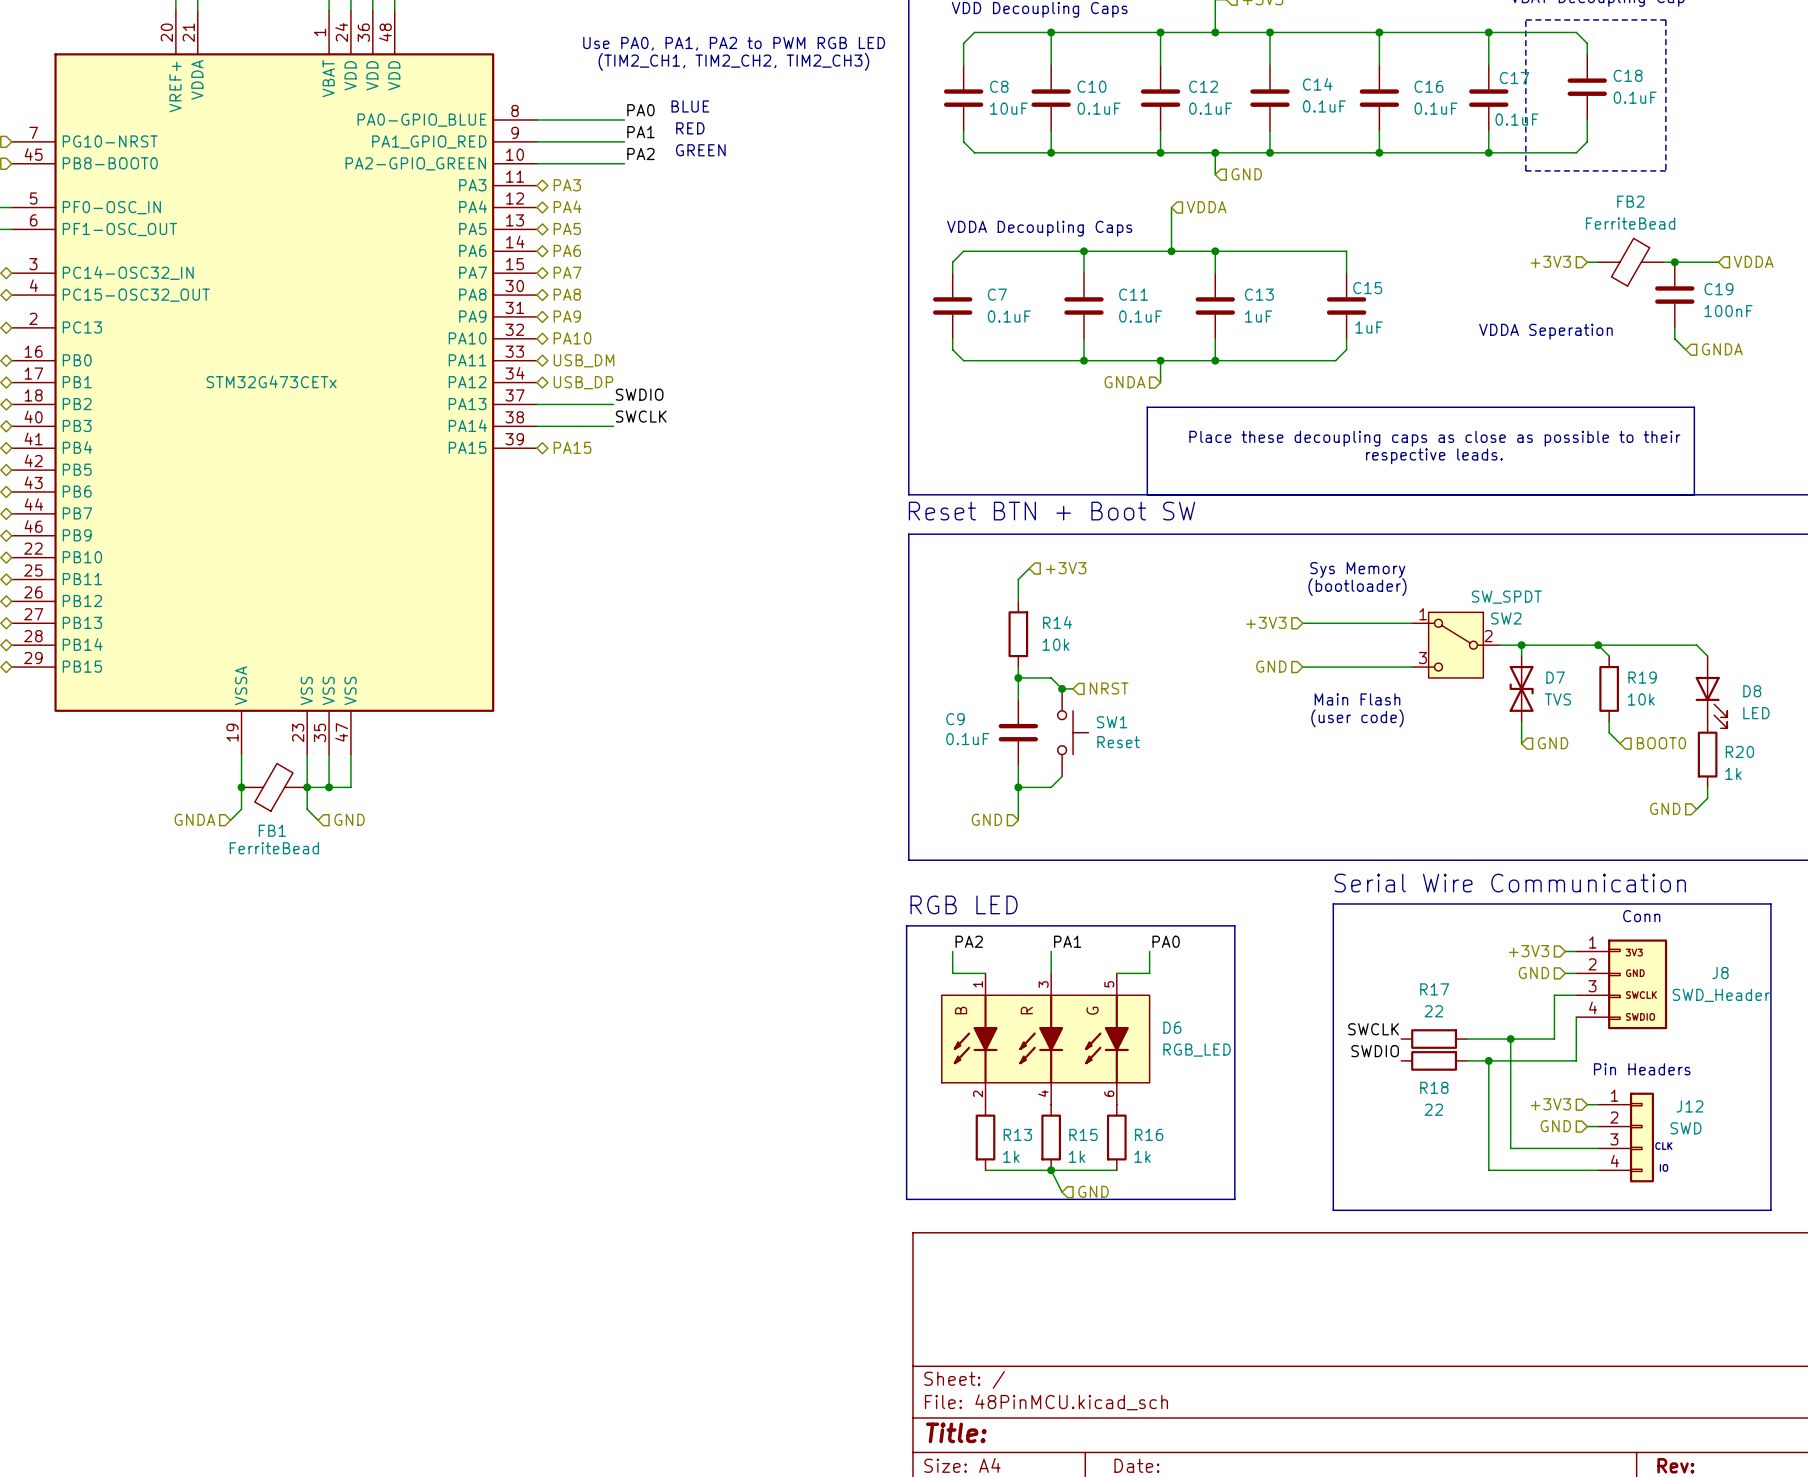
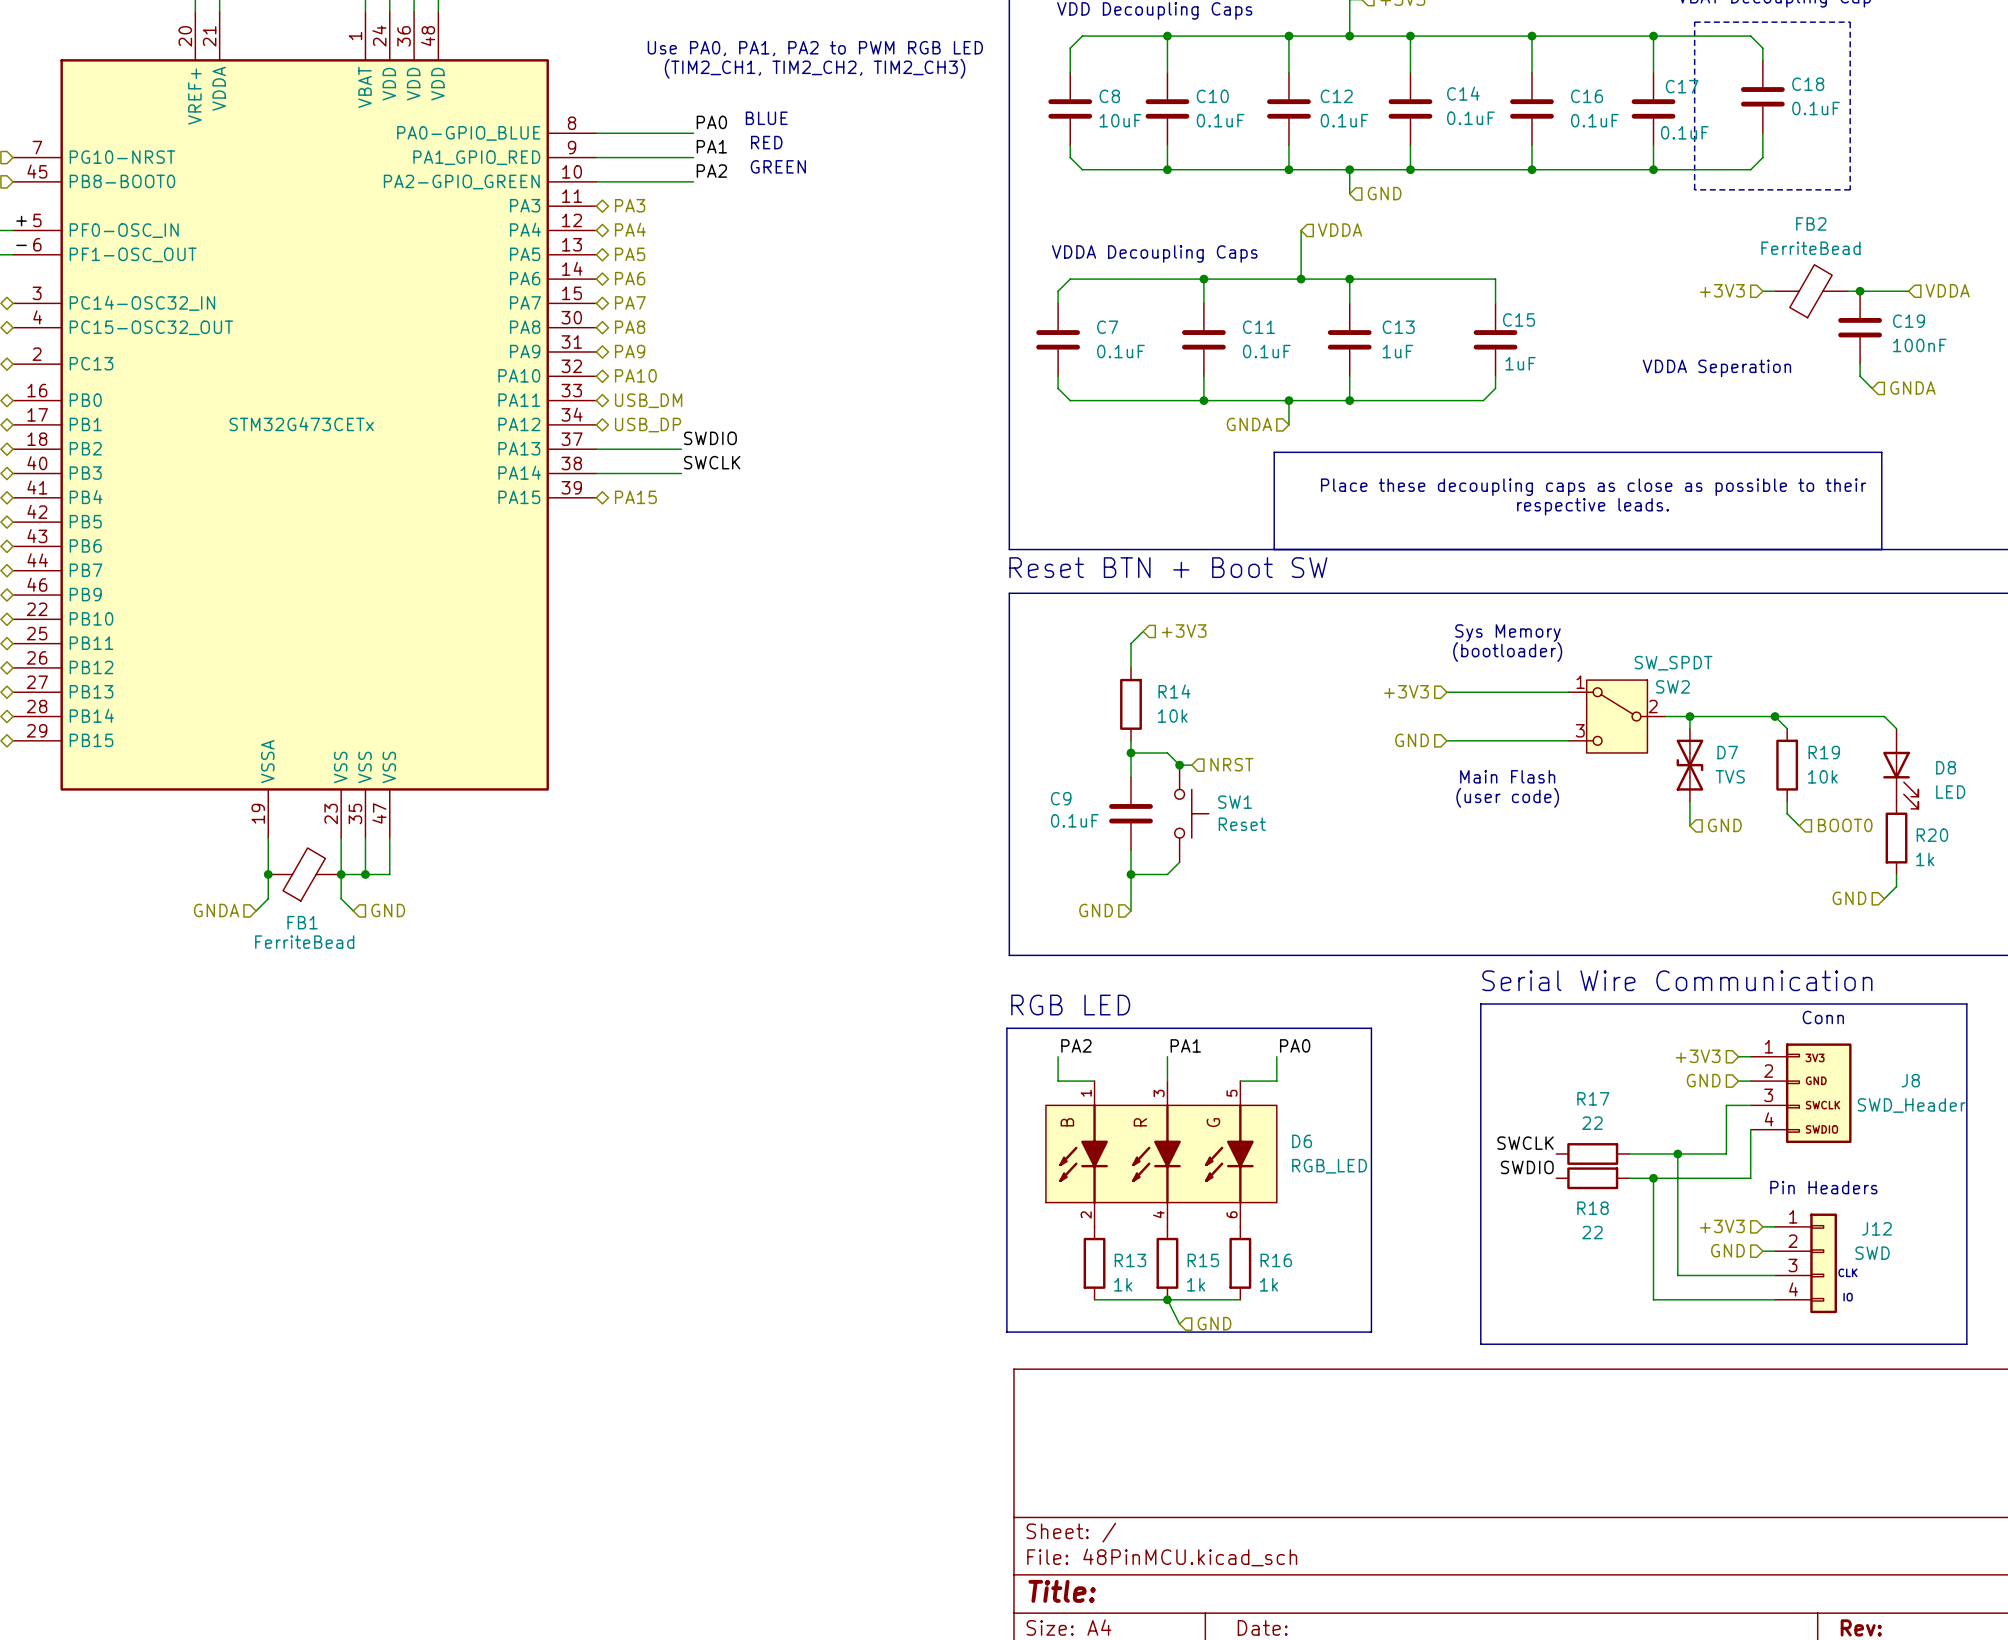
label: none -> + (21, 221)
label: none -> - (21, 245)

